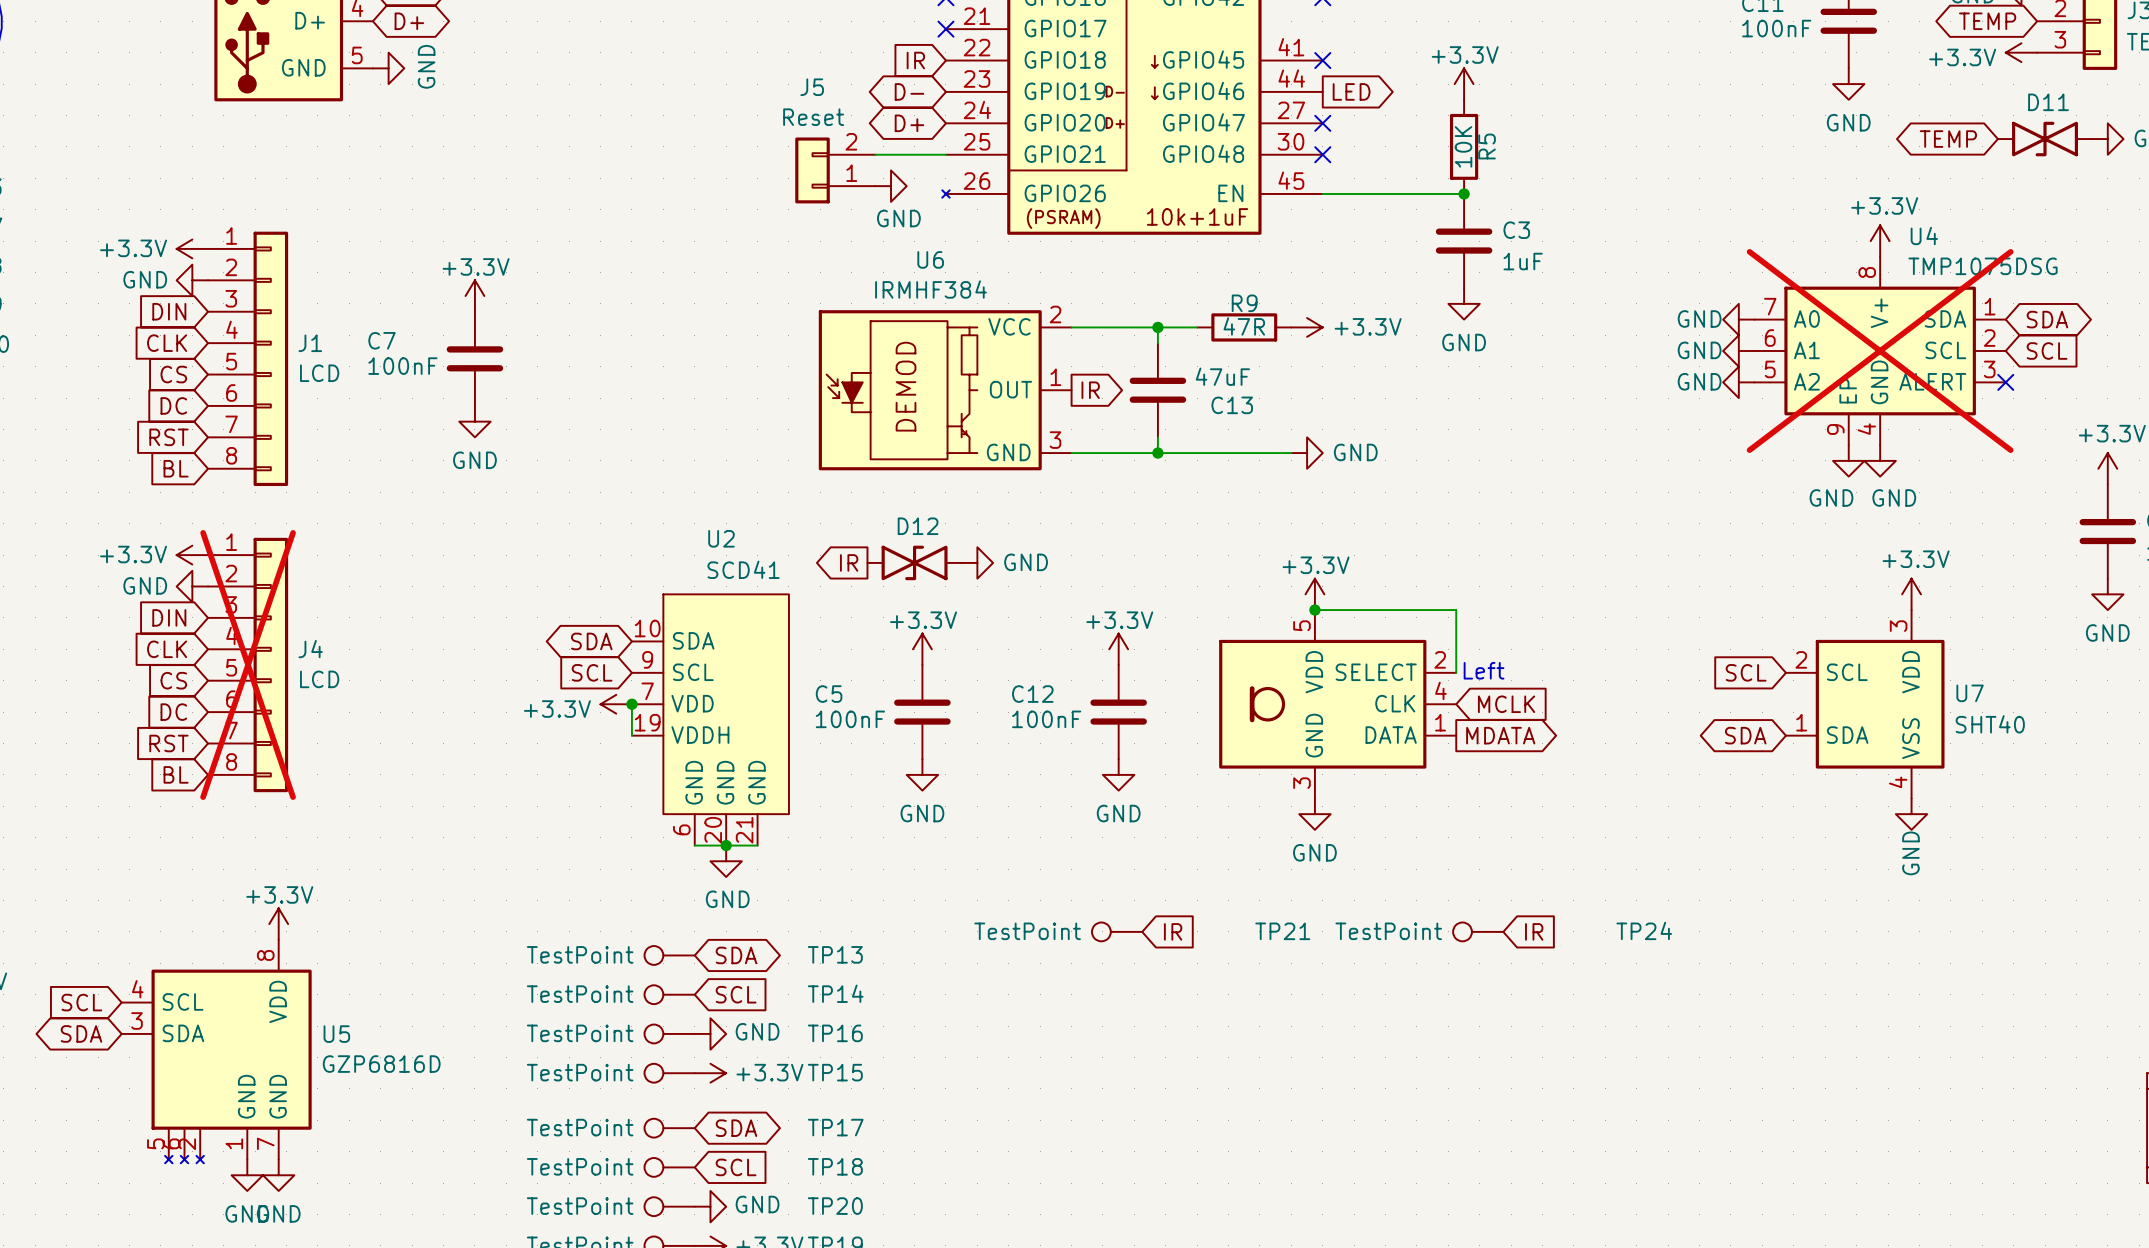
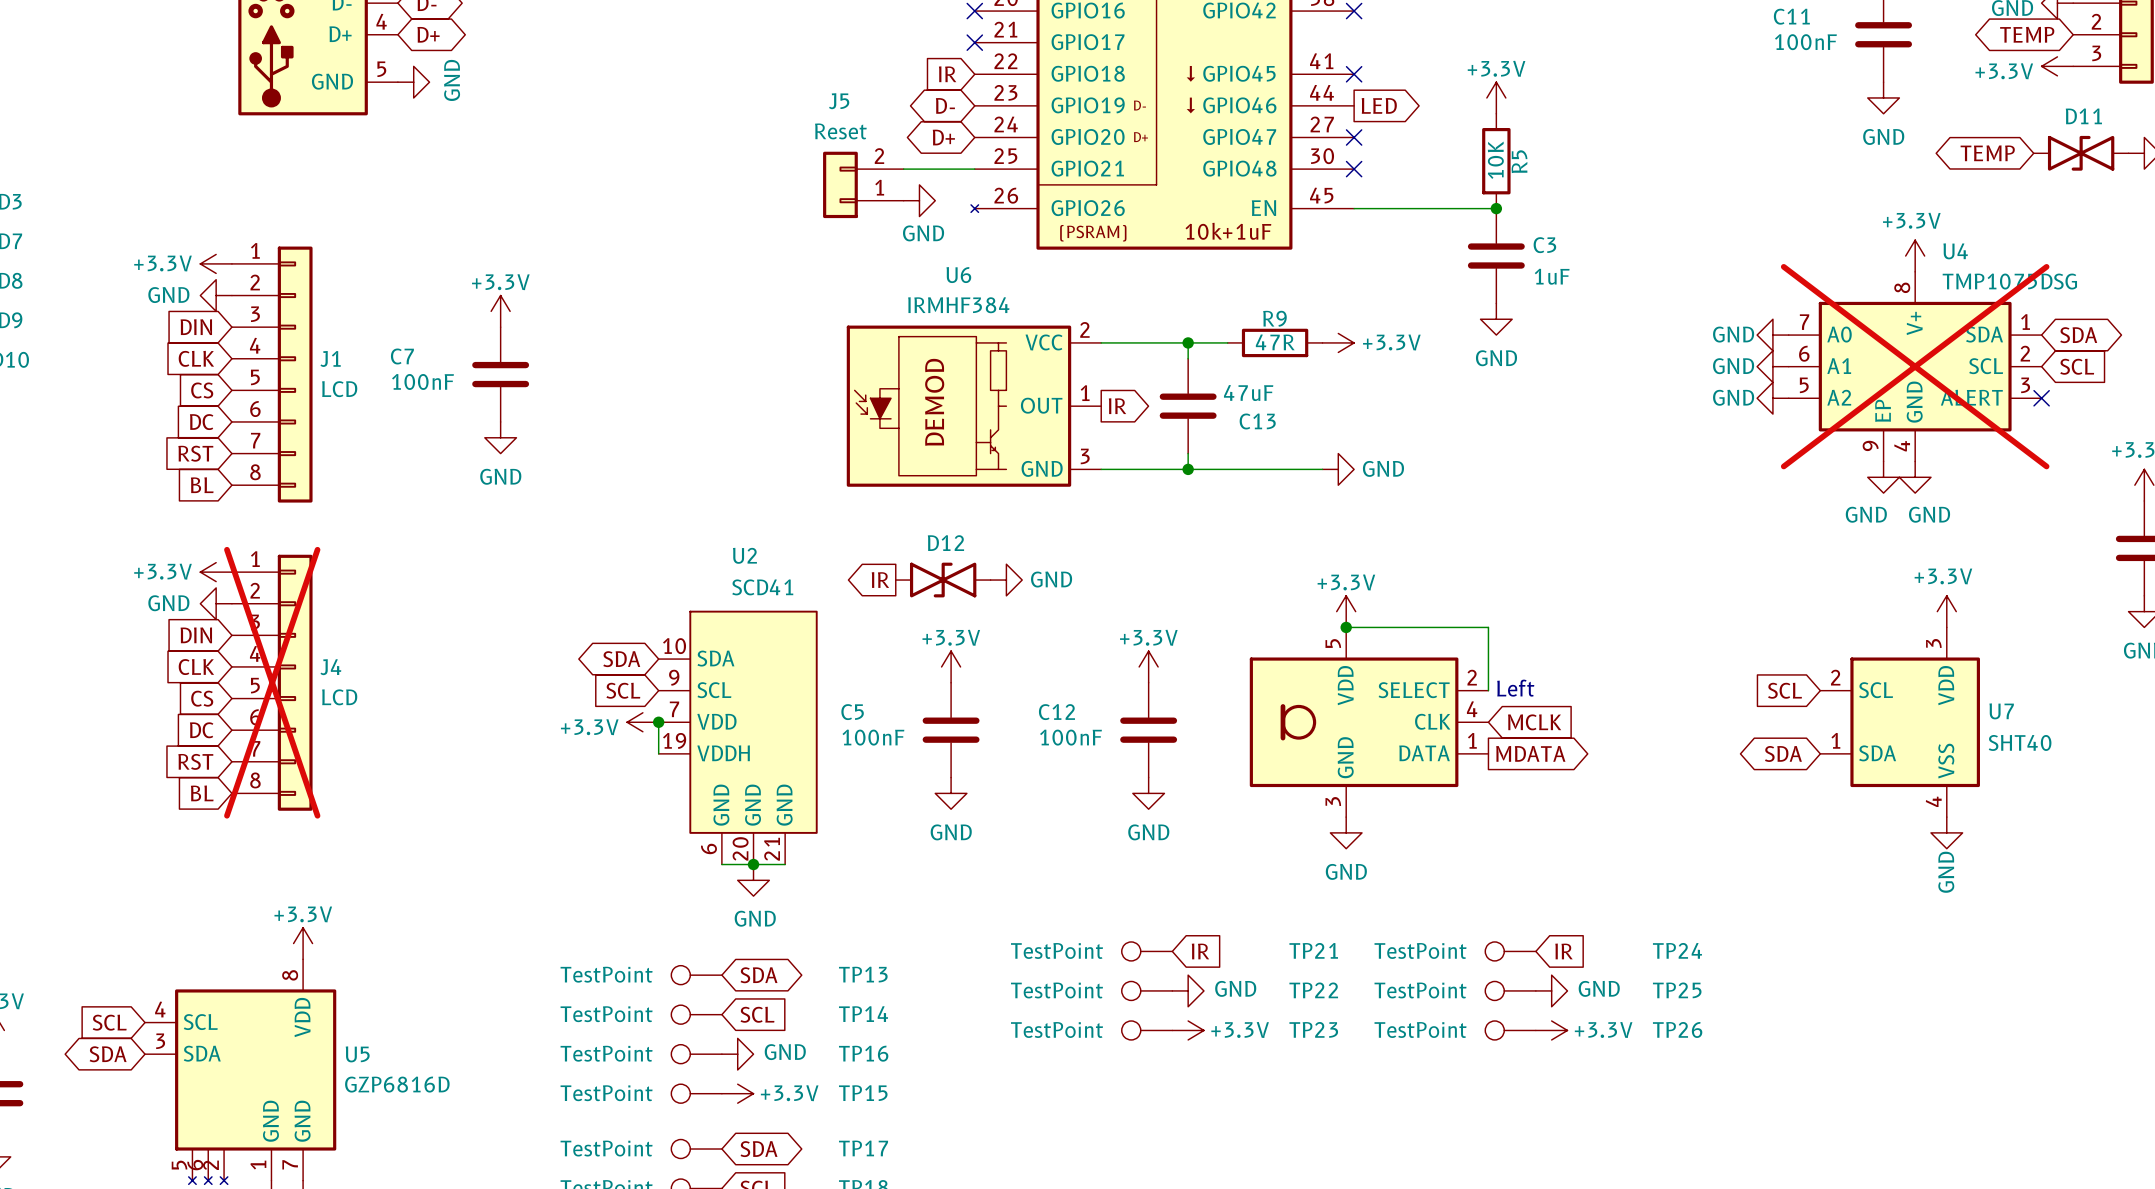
TP22: none -> TestPoint (1147, 990)
power symbol: none -> GND (1188, 990)
TP25: none -> TestPoint (1510, 990)
power symbol: none -> GND (1551, 990)
TP23: none -> TestPoint (1147, 1030)
power symbol: none -> +3.3V (1188, 1030)
TP26: none -> TestPoint (1510, 1030)
power symbol: none -> +3.3V (1551, 1030)

